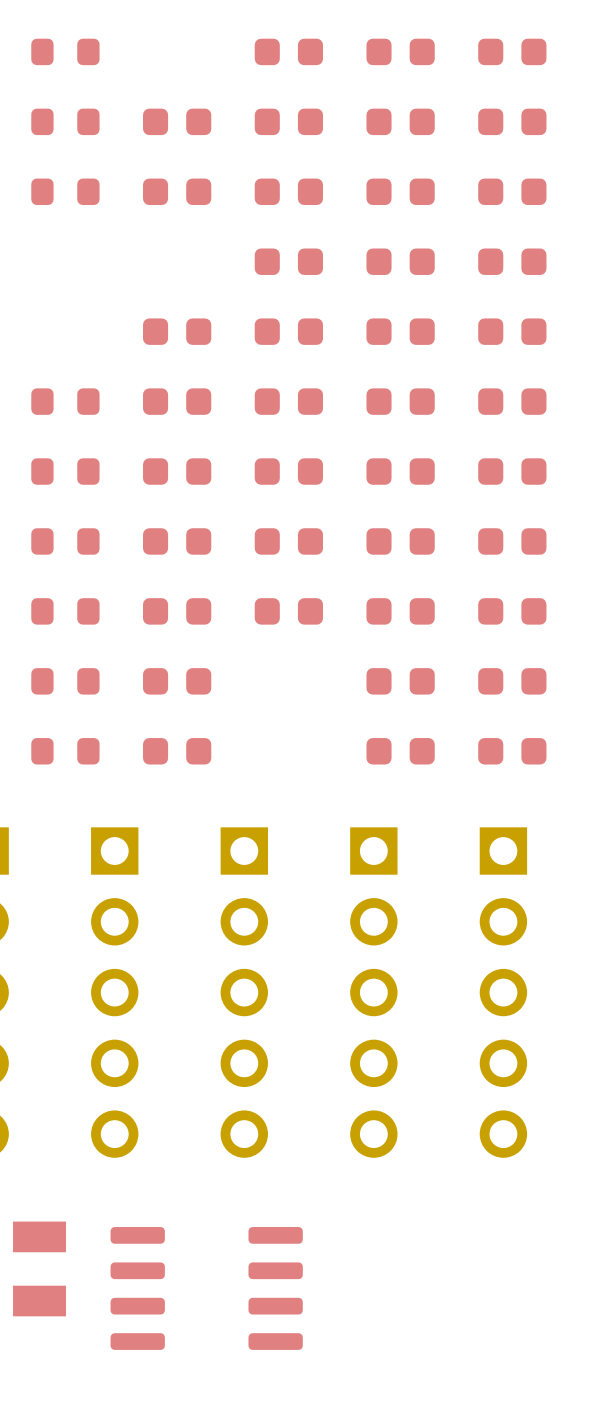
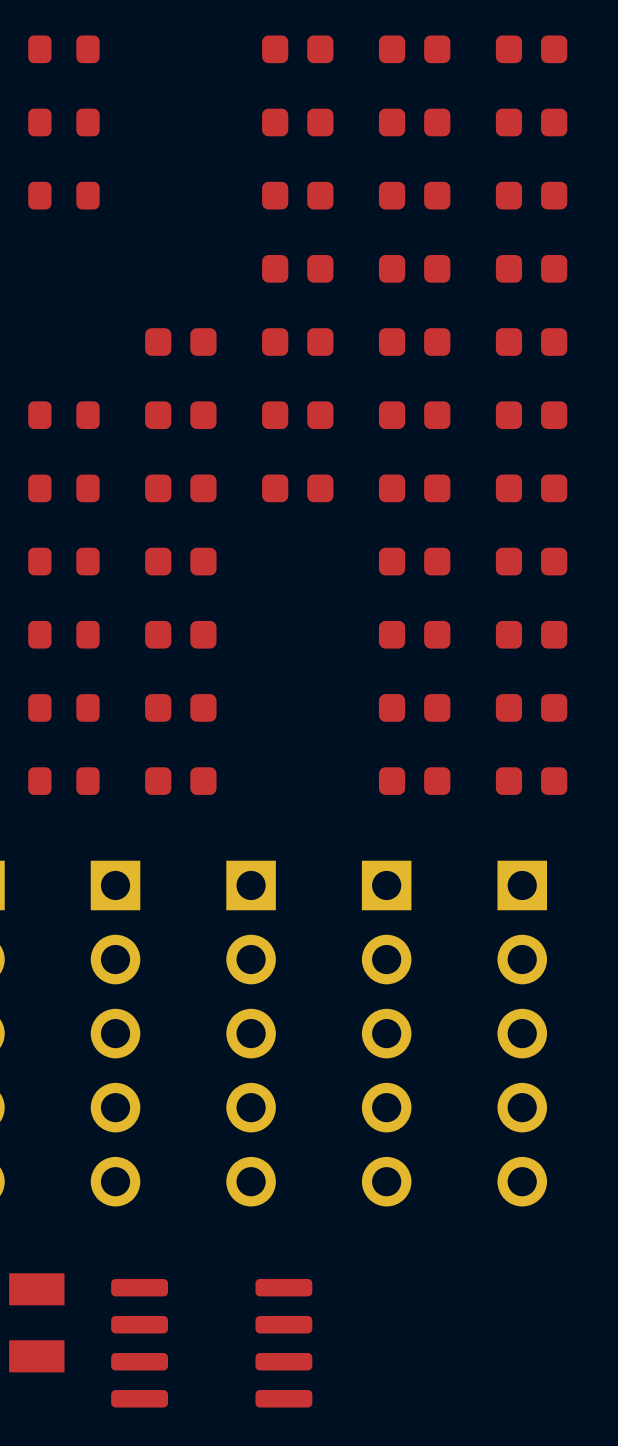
part: (177, 121) -> none
part: (177, 191) -> none
part: (288, 541) -> none
part: (288, 611) -> none

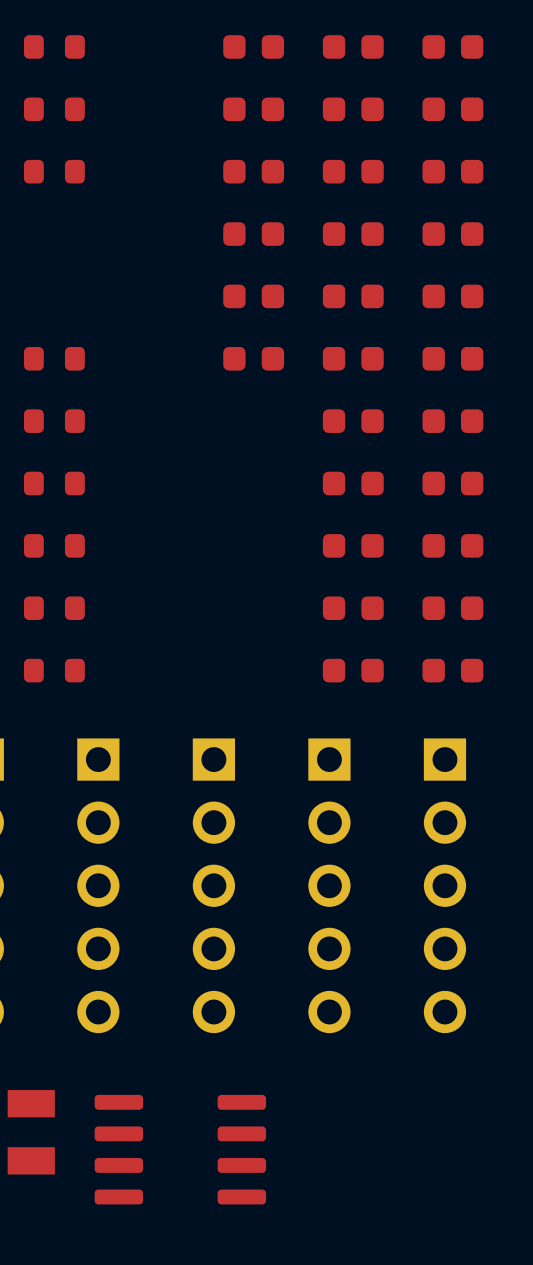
part: (180, 342) -> none
part: (180, 415) -> none
part: (180, 488) -> none
part: (297, 488) -> none
part: (180, 561) -> none
part: (180, 634) -> none
part: (180, 707) -> none
part: (180, 781) -> none

